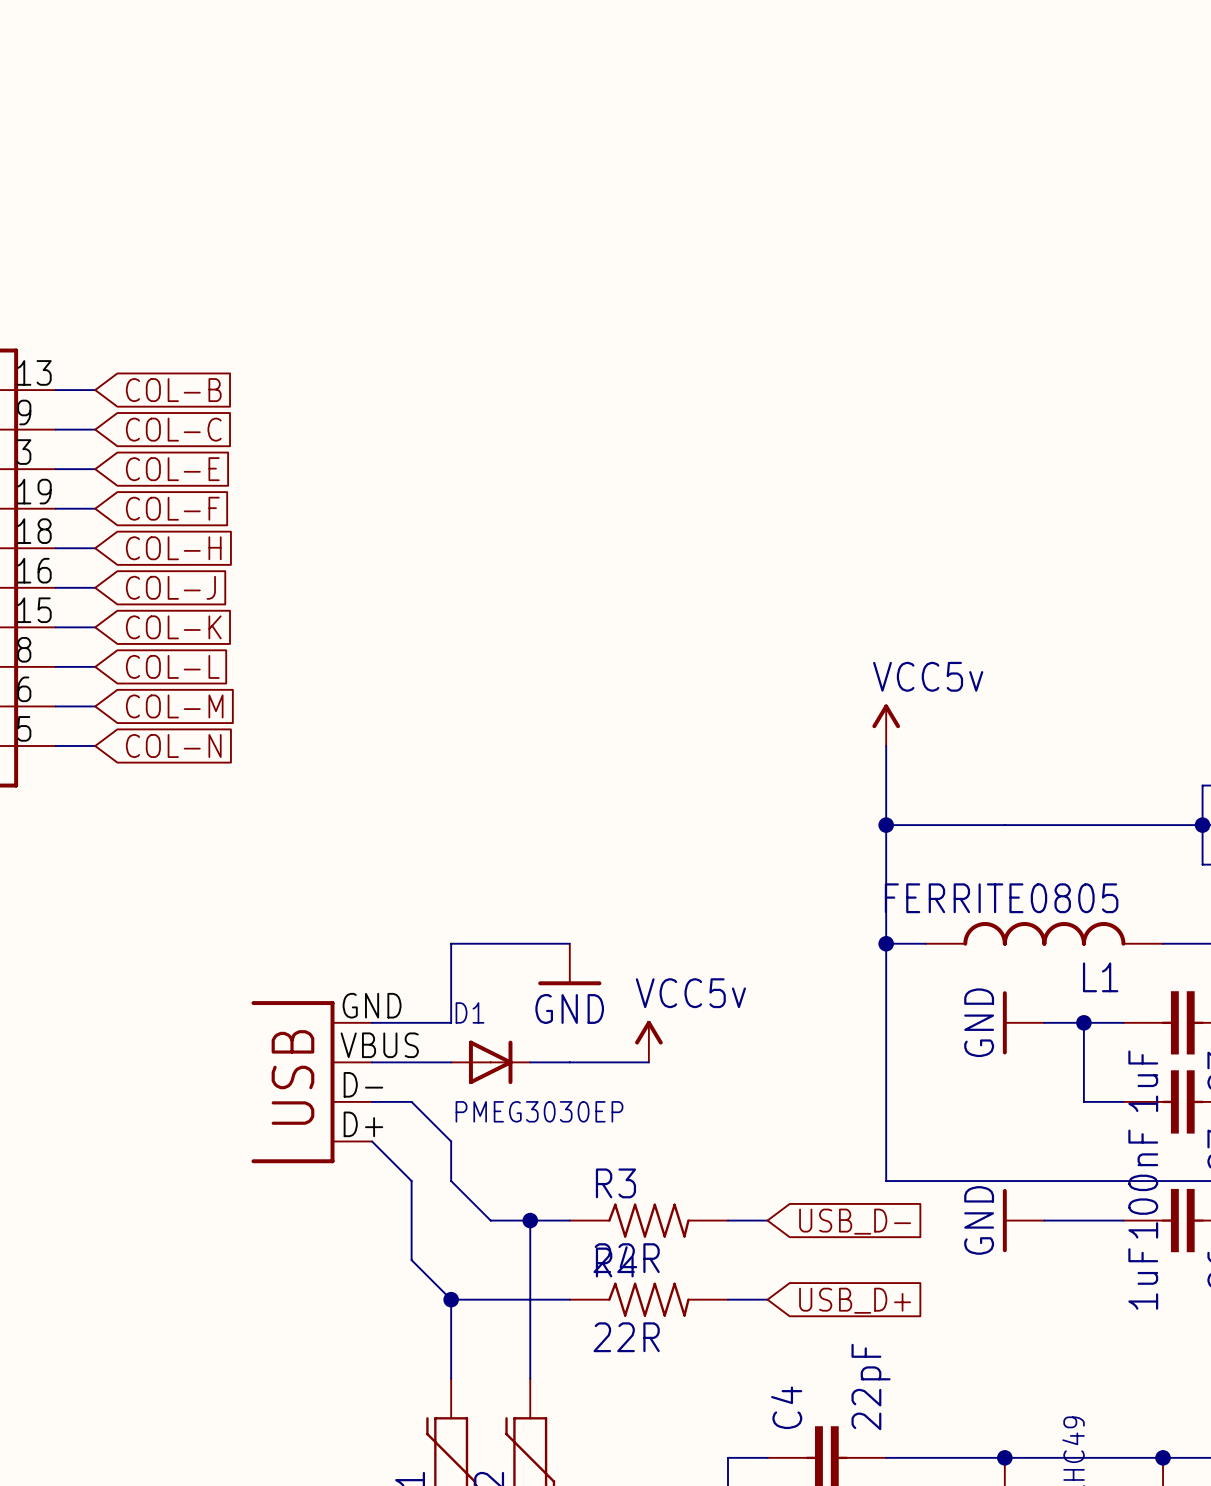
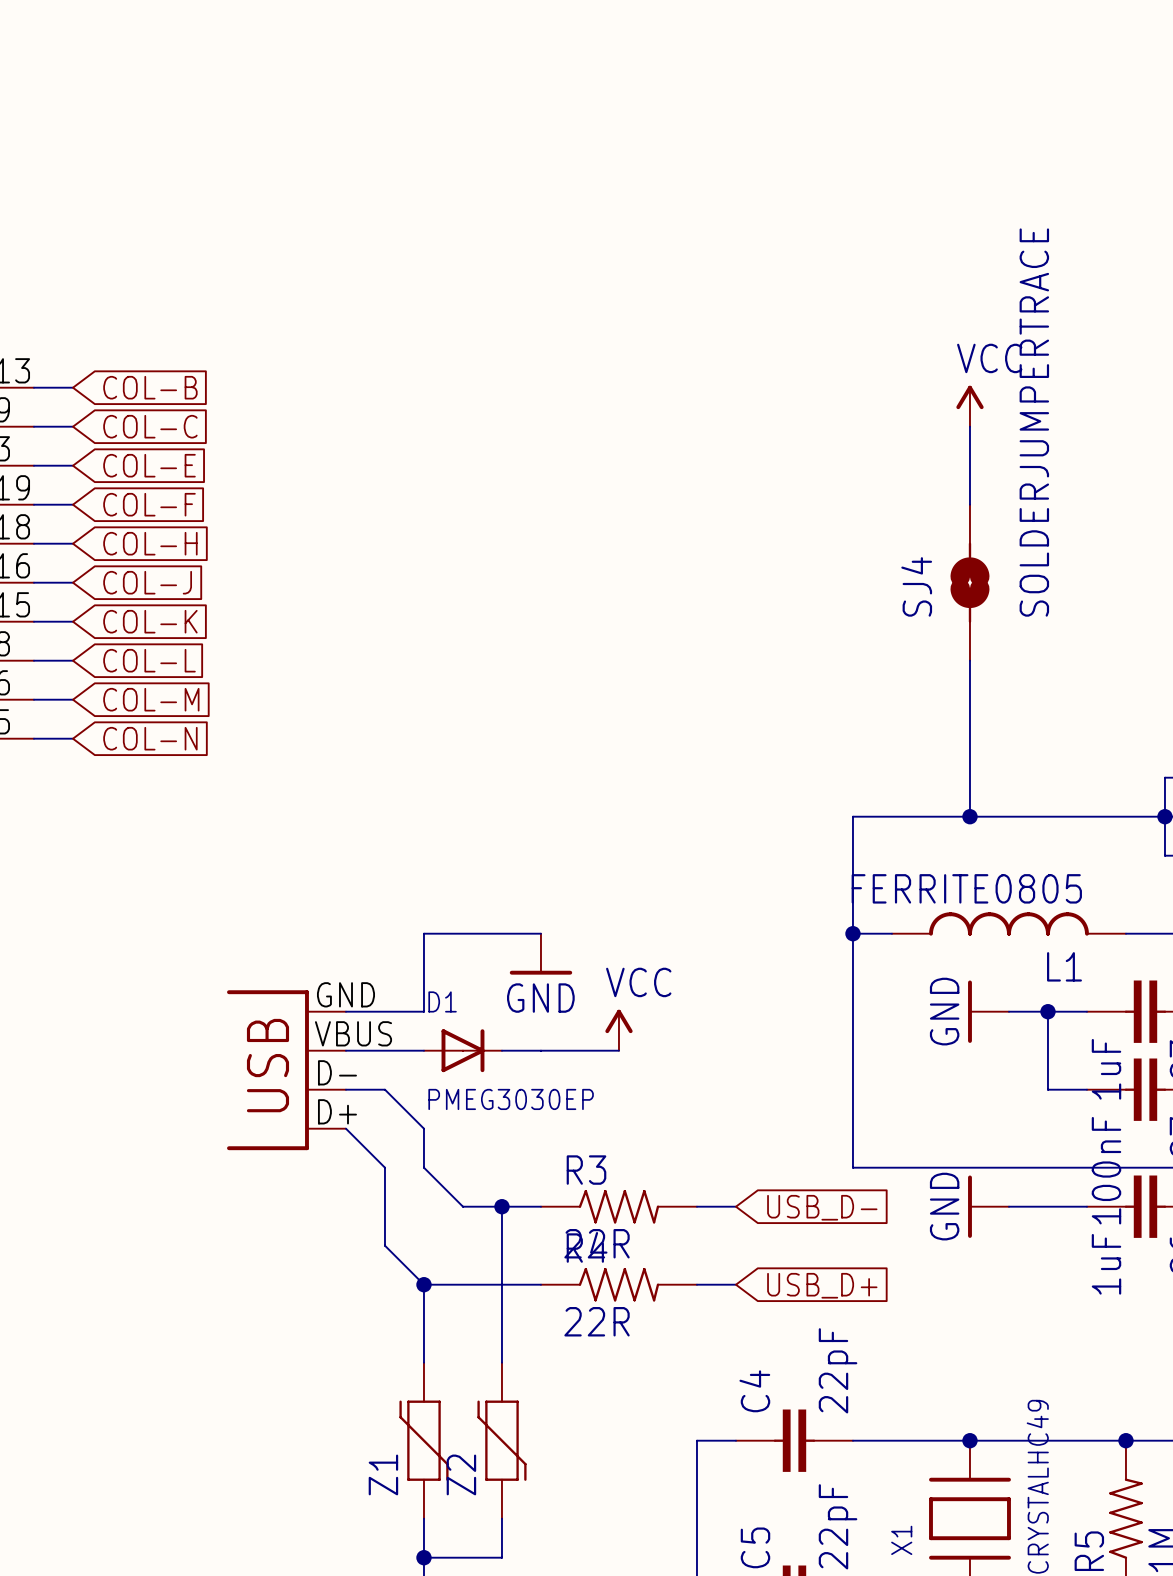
power symbol: none -> VCC (969, 406)
SJ4: none -> SOLDERJUMPERTRACE (969, 582)
wire: none -> (969, 660) (969, 816)
power symbol: VCC5v (886, 725) -> none
wire: (886, 746) (886, 825) -> (969, 426) (969, 504)
junction: (886, 825) -> none
junction: none -> (969, 816)
power symbol: VCC5v (648, 1041) -> VCC (618, 1030)

